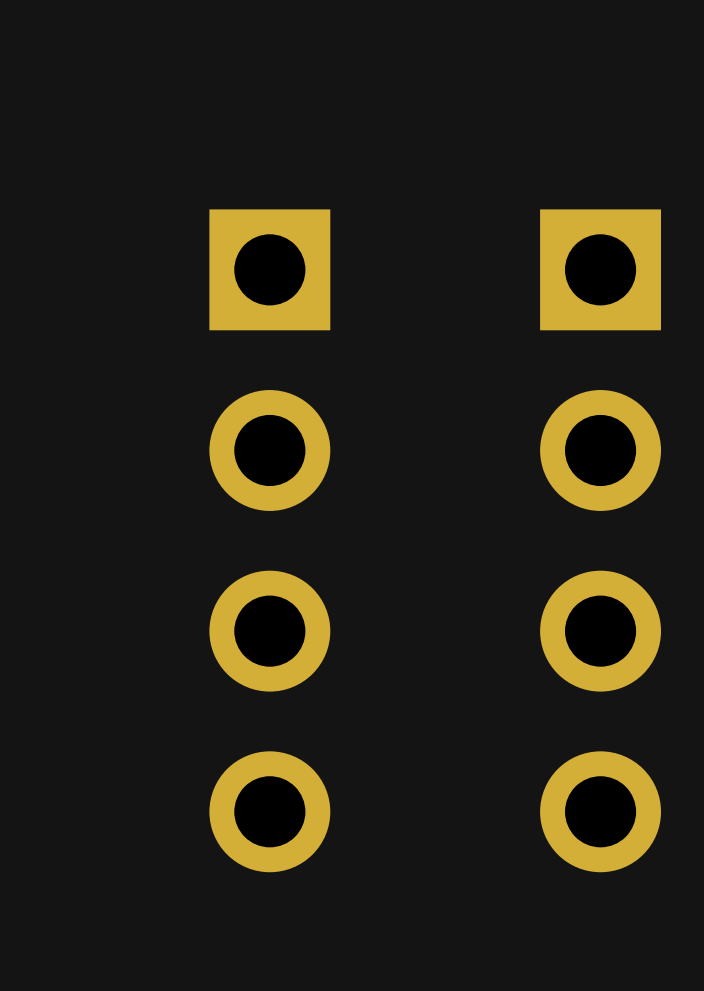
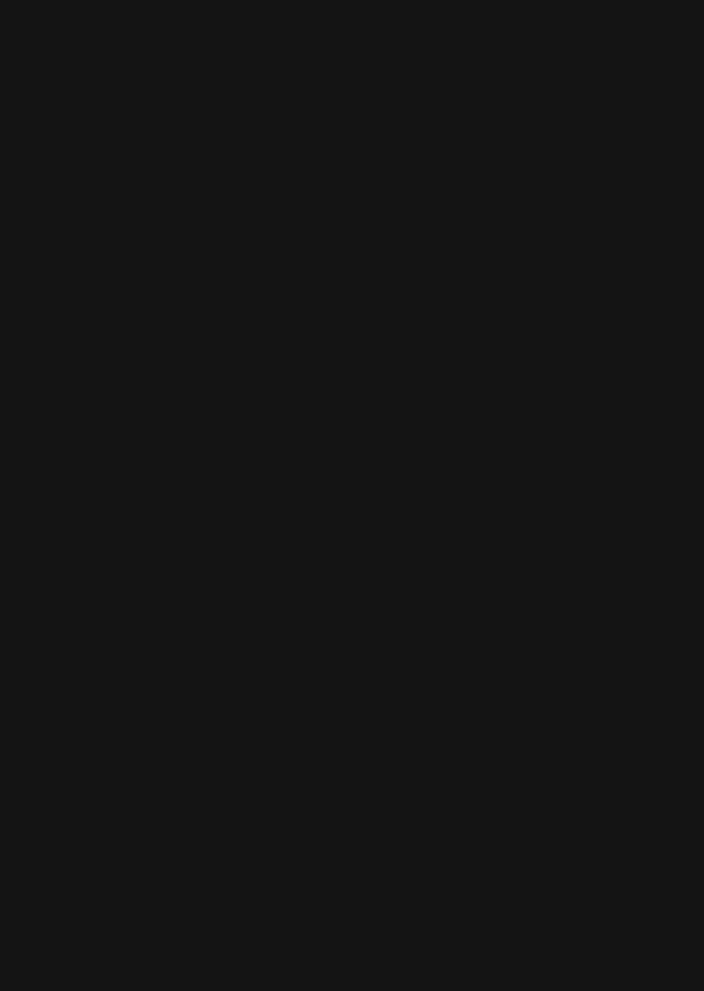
part: (269, 540) -> none
part: (600, 540) -> none

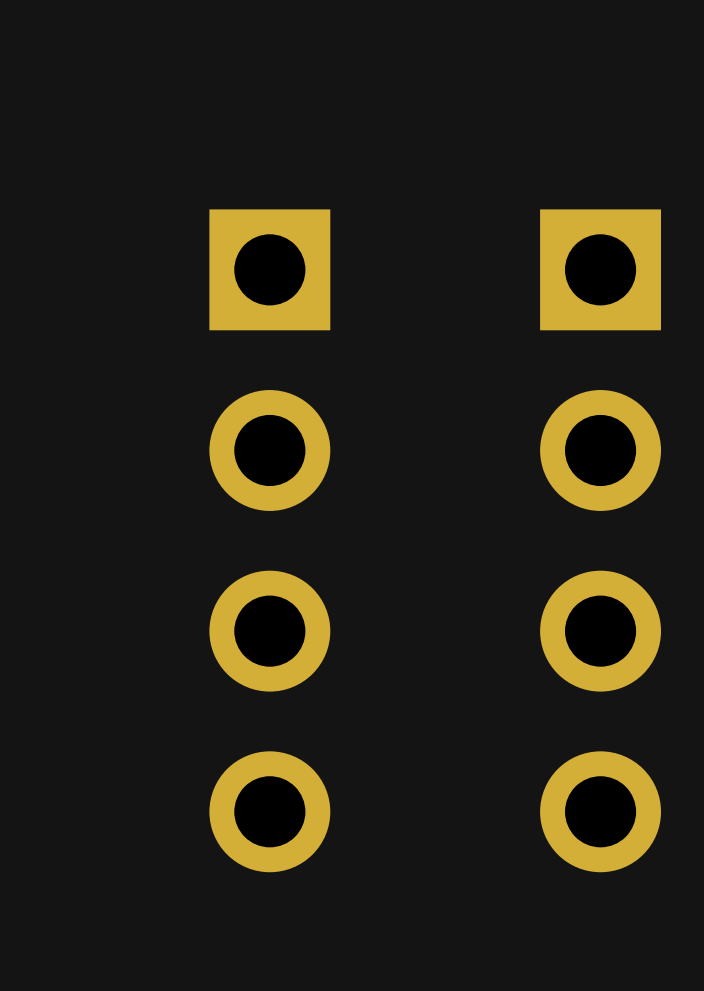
part: none -> (269, 540)
part: none -> (600, 540)

